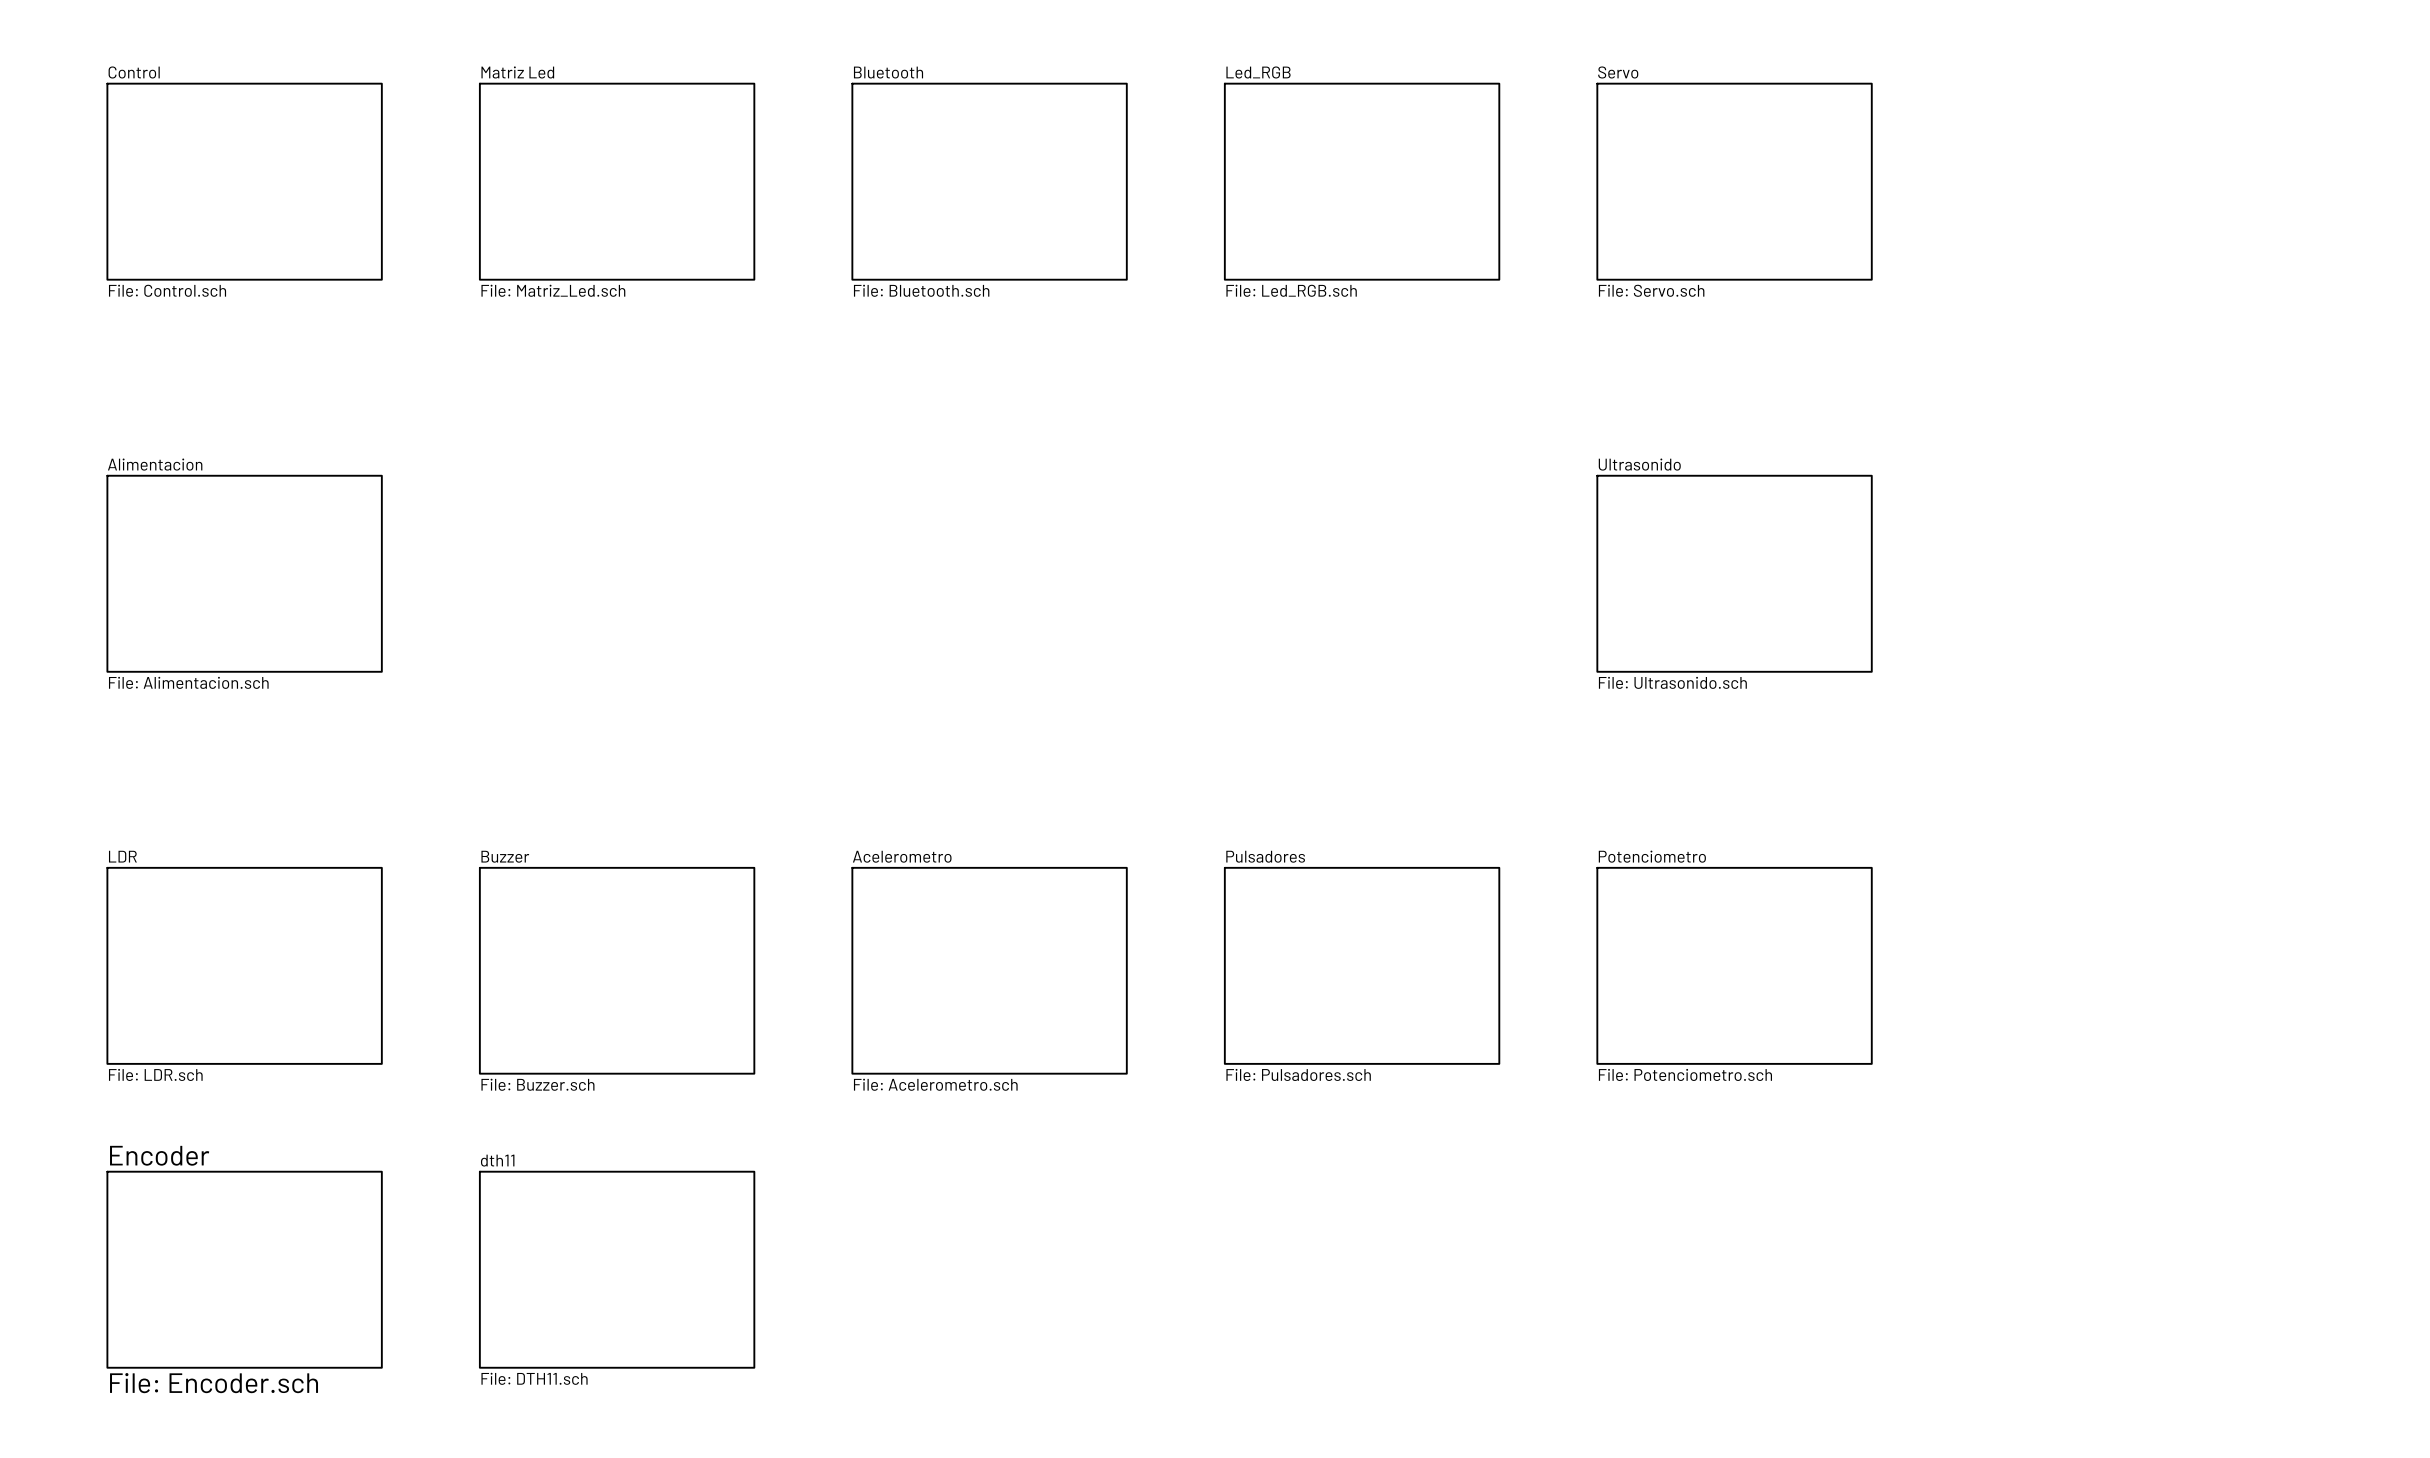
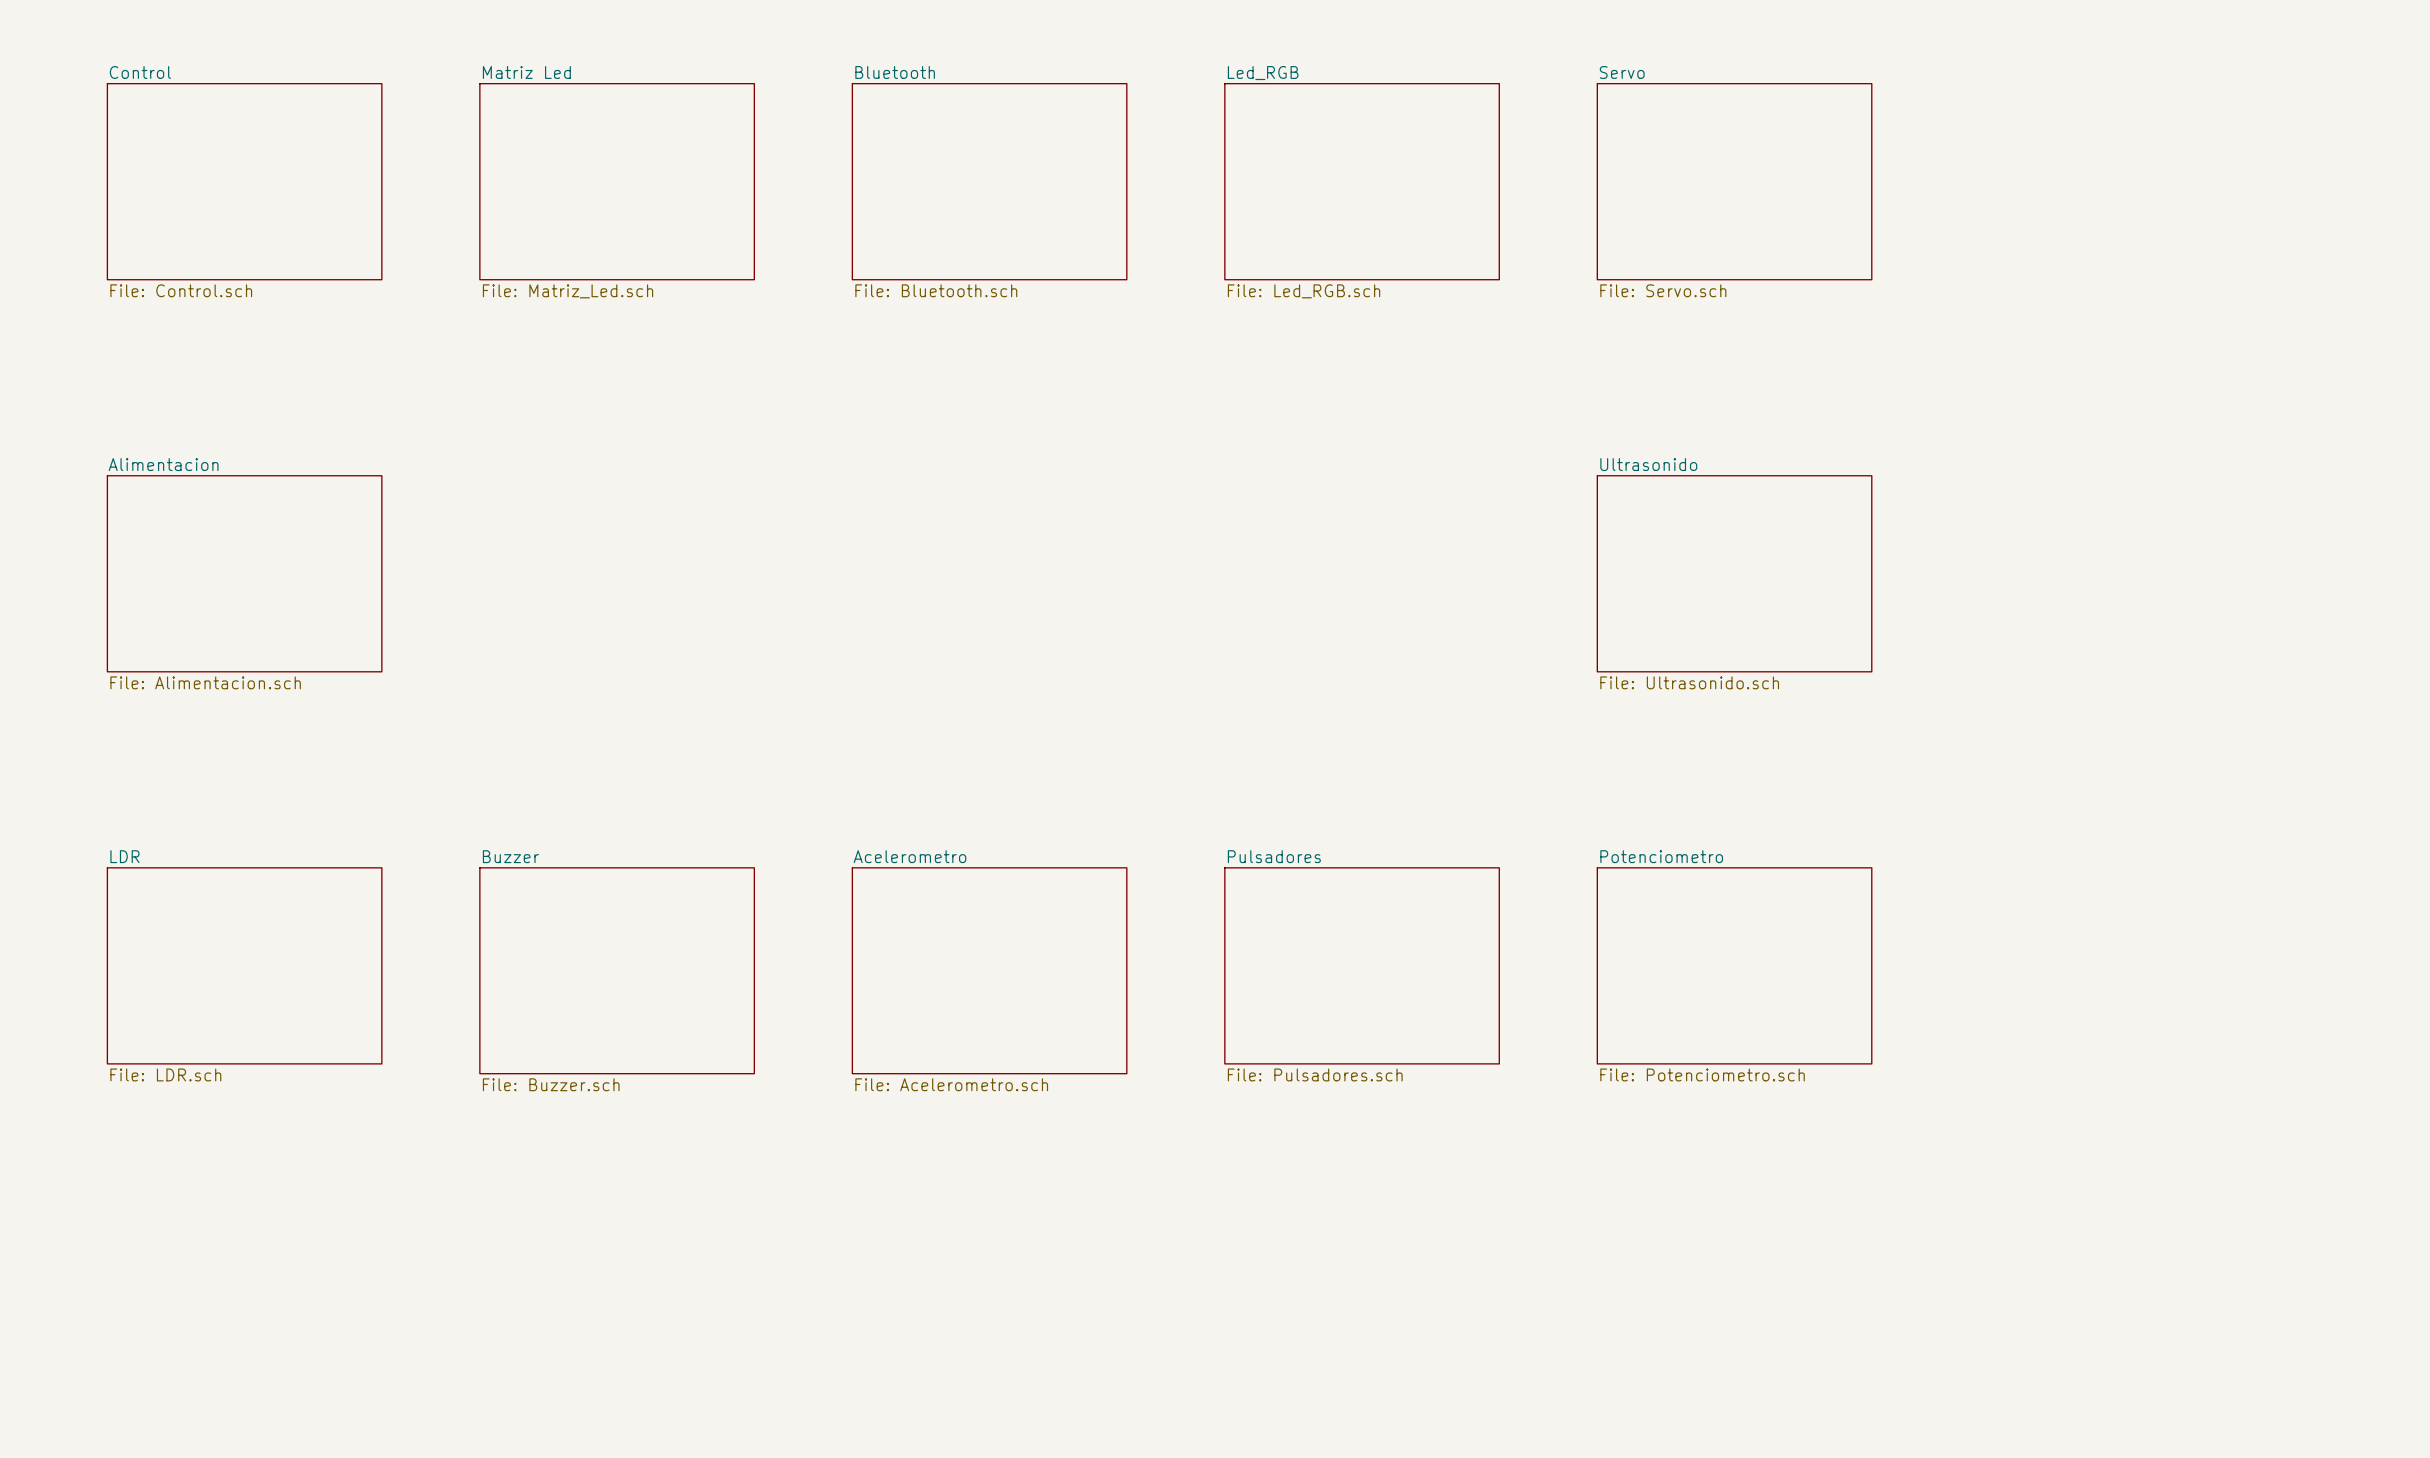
sheet Encoder: File: Encoder.sch (244, 1269) -> none
sheet dth11: File: DTH11.sch (617, 1269) -> none

